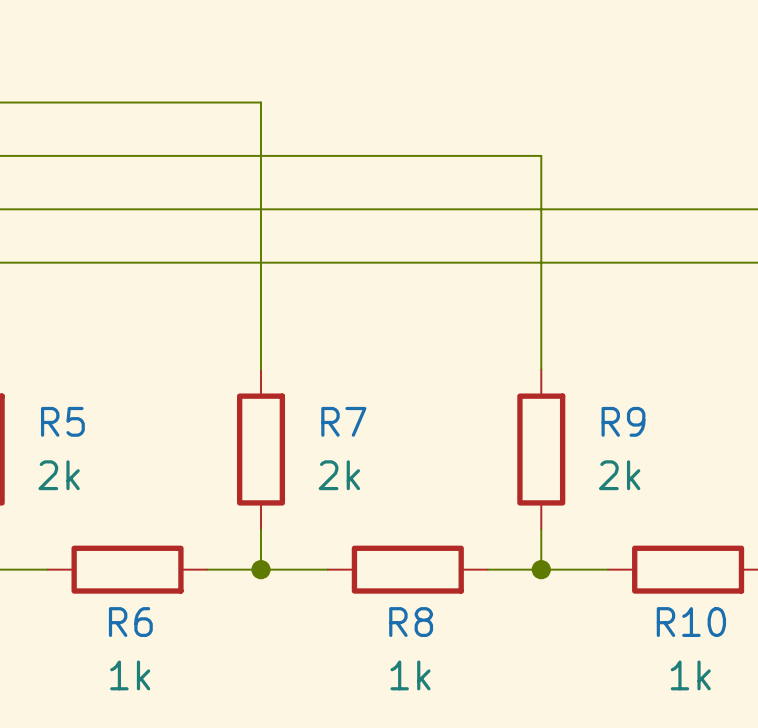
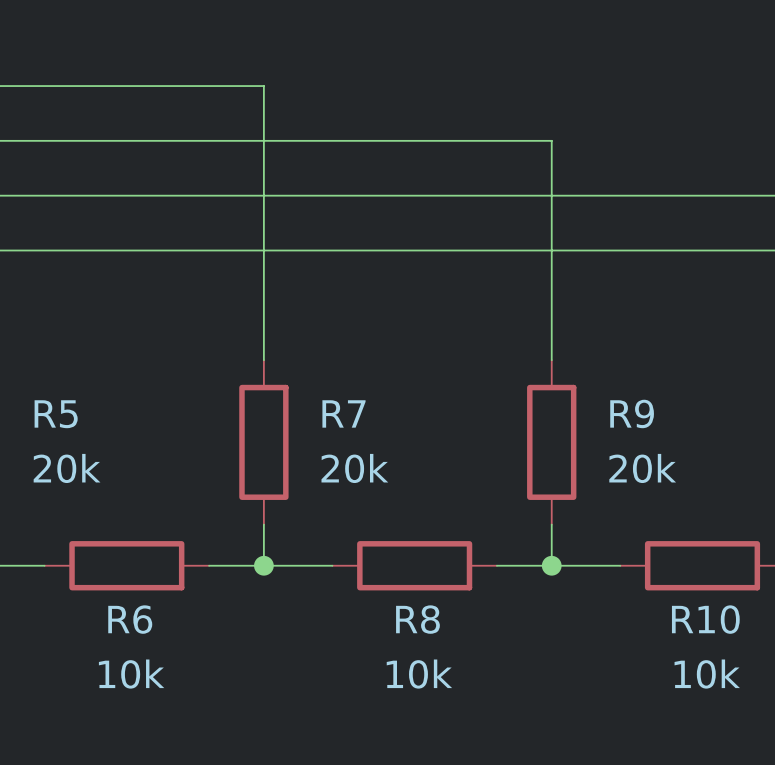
R5 value: 2k (59, 475) -> 20k (67, 468)
R7 value: 2k (339, 475) -> 20k (354, 468)
R9 value: 2k (619, 475) -> 20k (642, 468)
R6 value: 1k (130, 675) -> 10k (131, 674)
R8 value: 1k (410, 675) -> 10k (419, 674)
R10 value: 1k (690, 675) -> 10k (707, 674)

